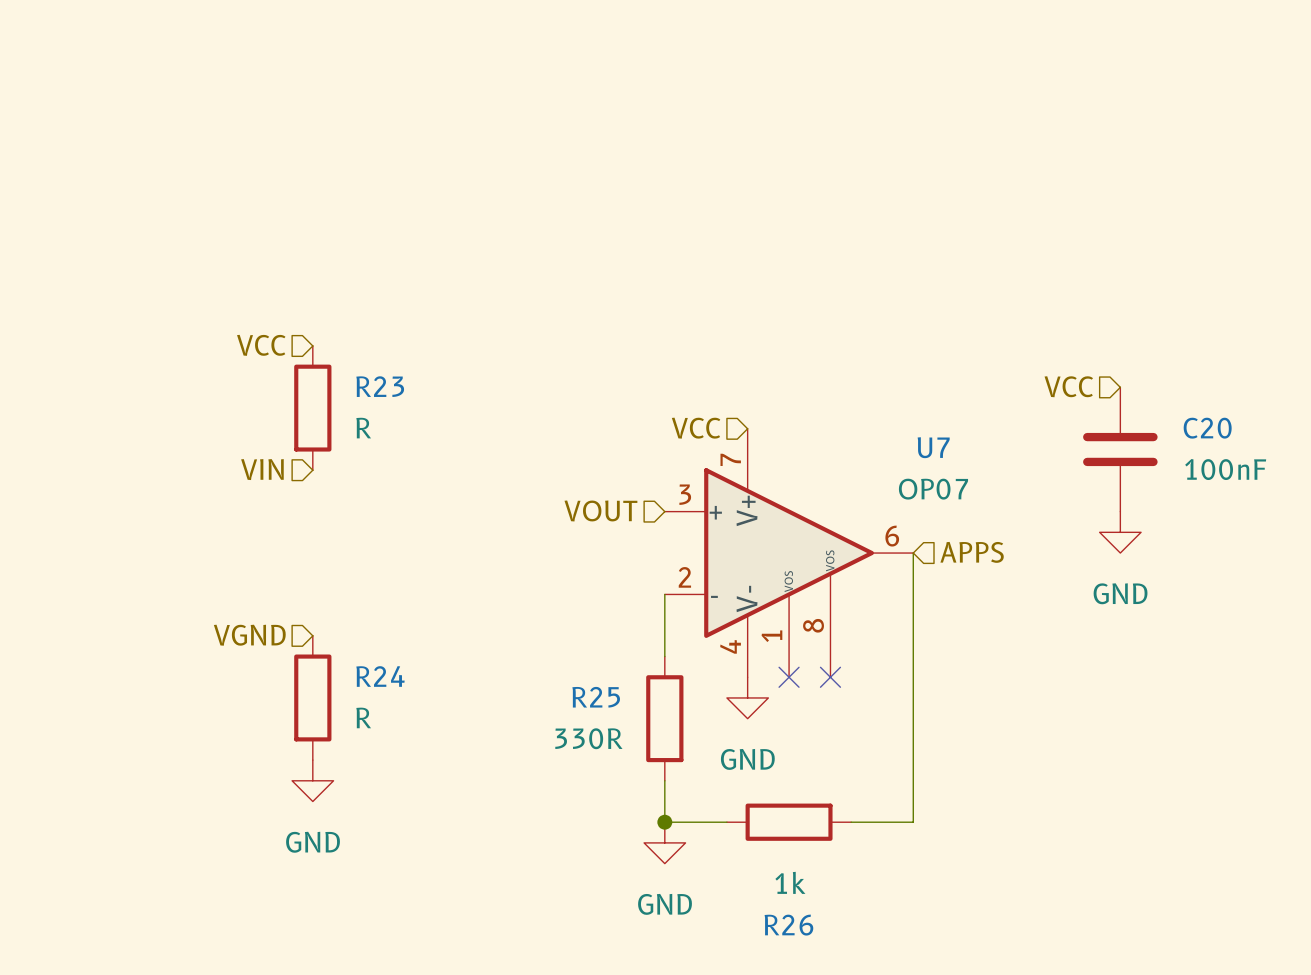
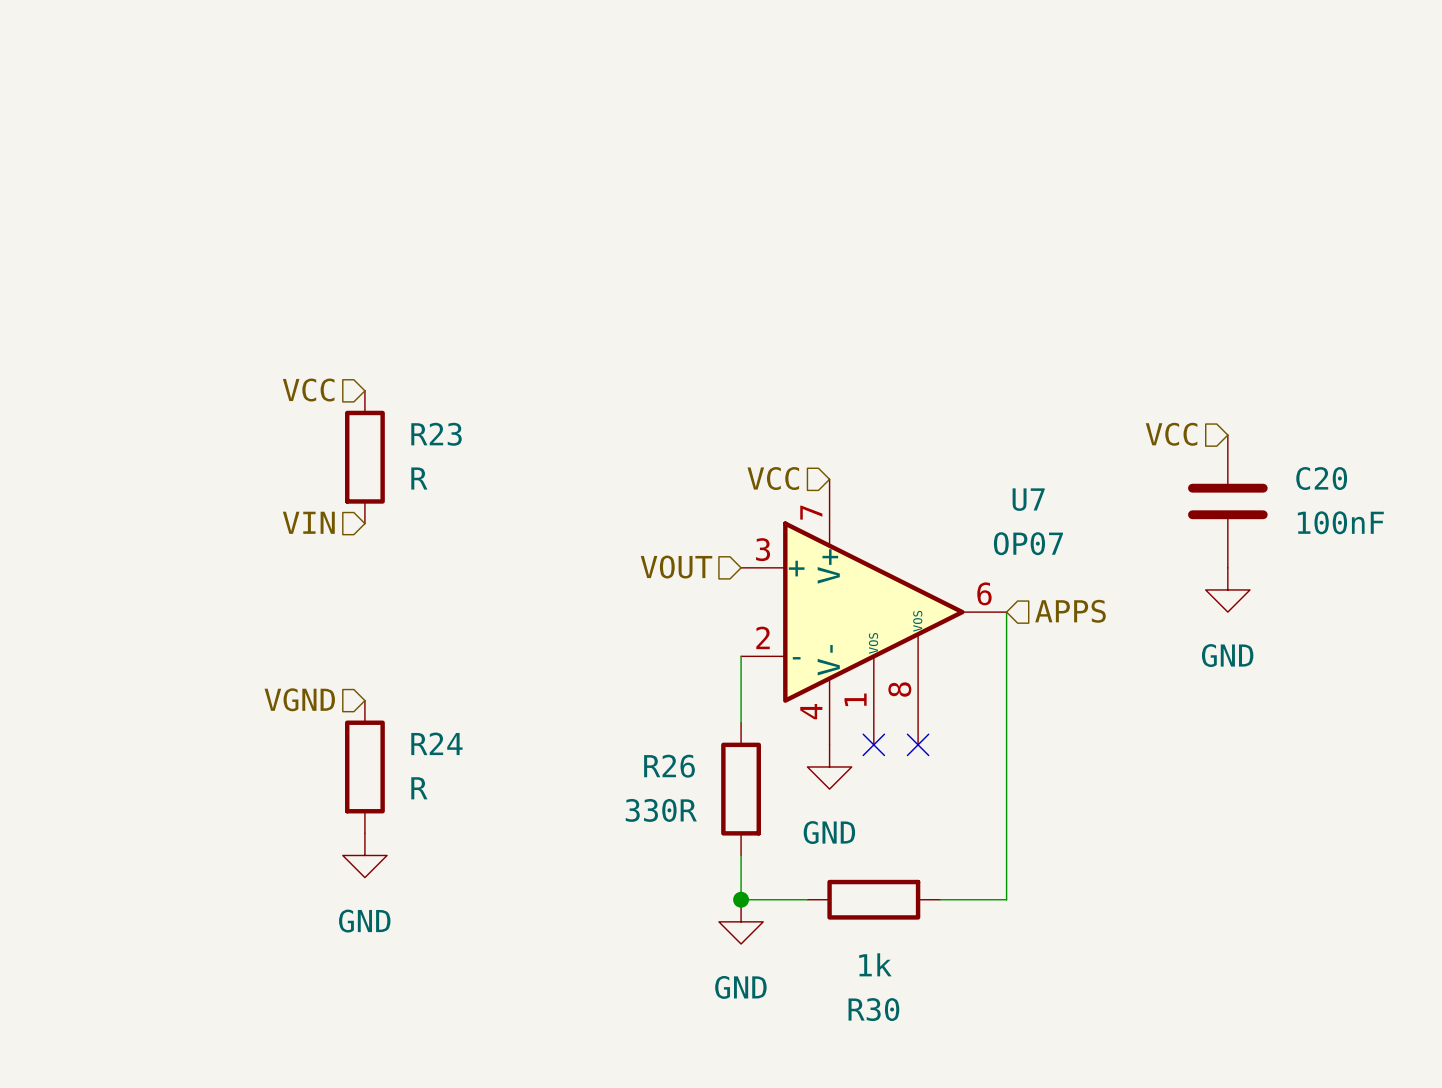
R25 name: R25 (596, 697) -> R26 (669, 766)
R26 name: R26 (788, 925) -> R30 (873, 1009)

